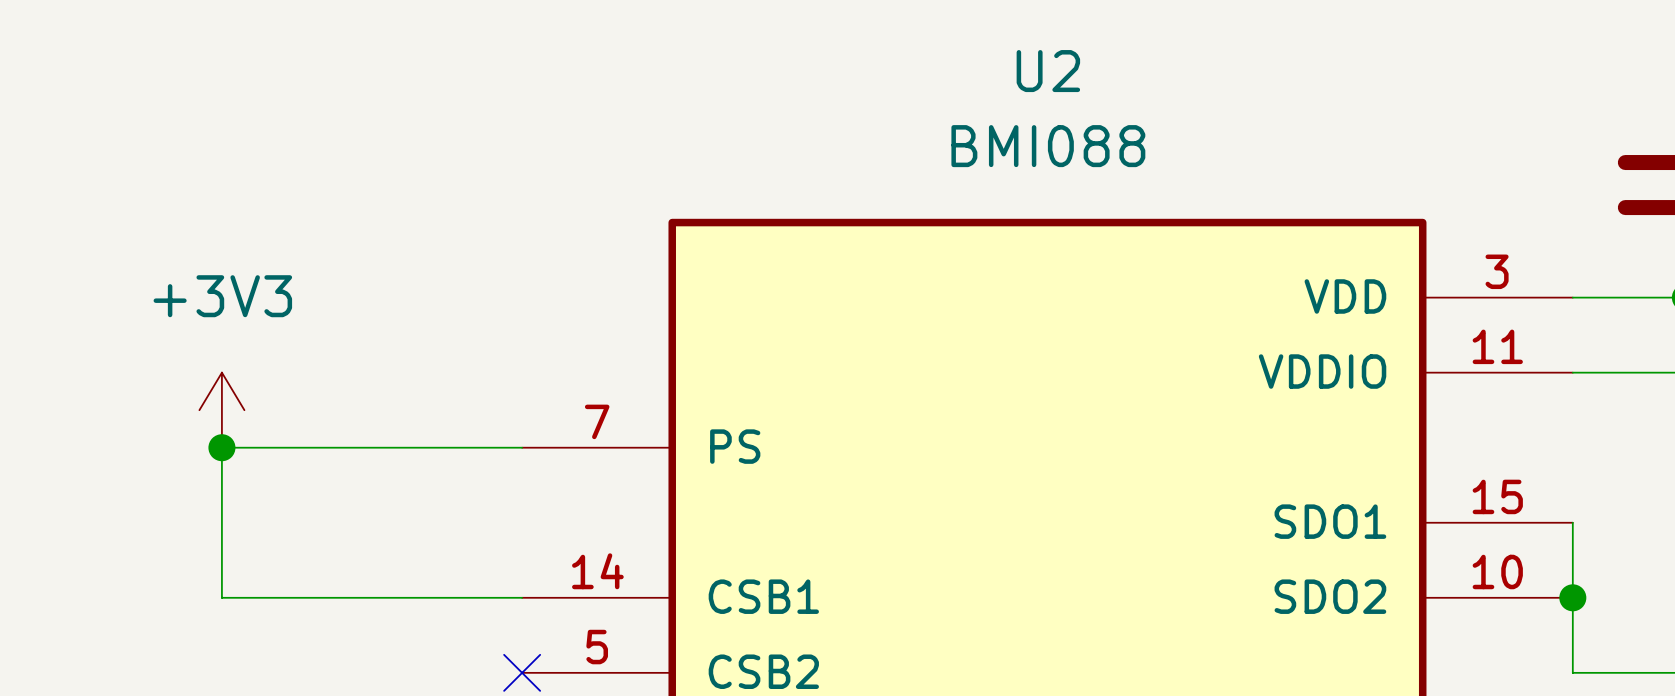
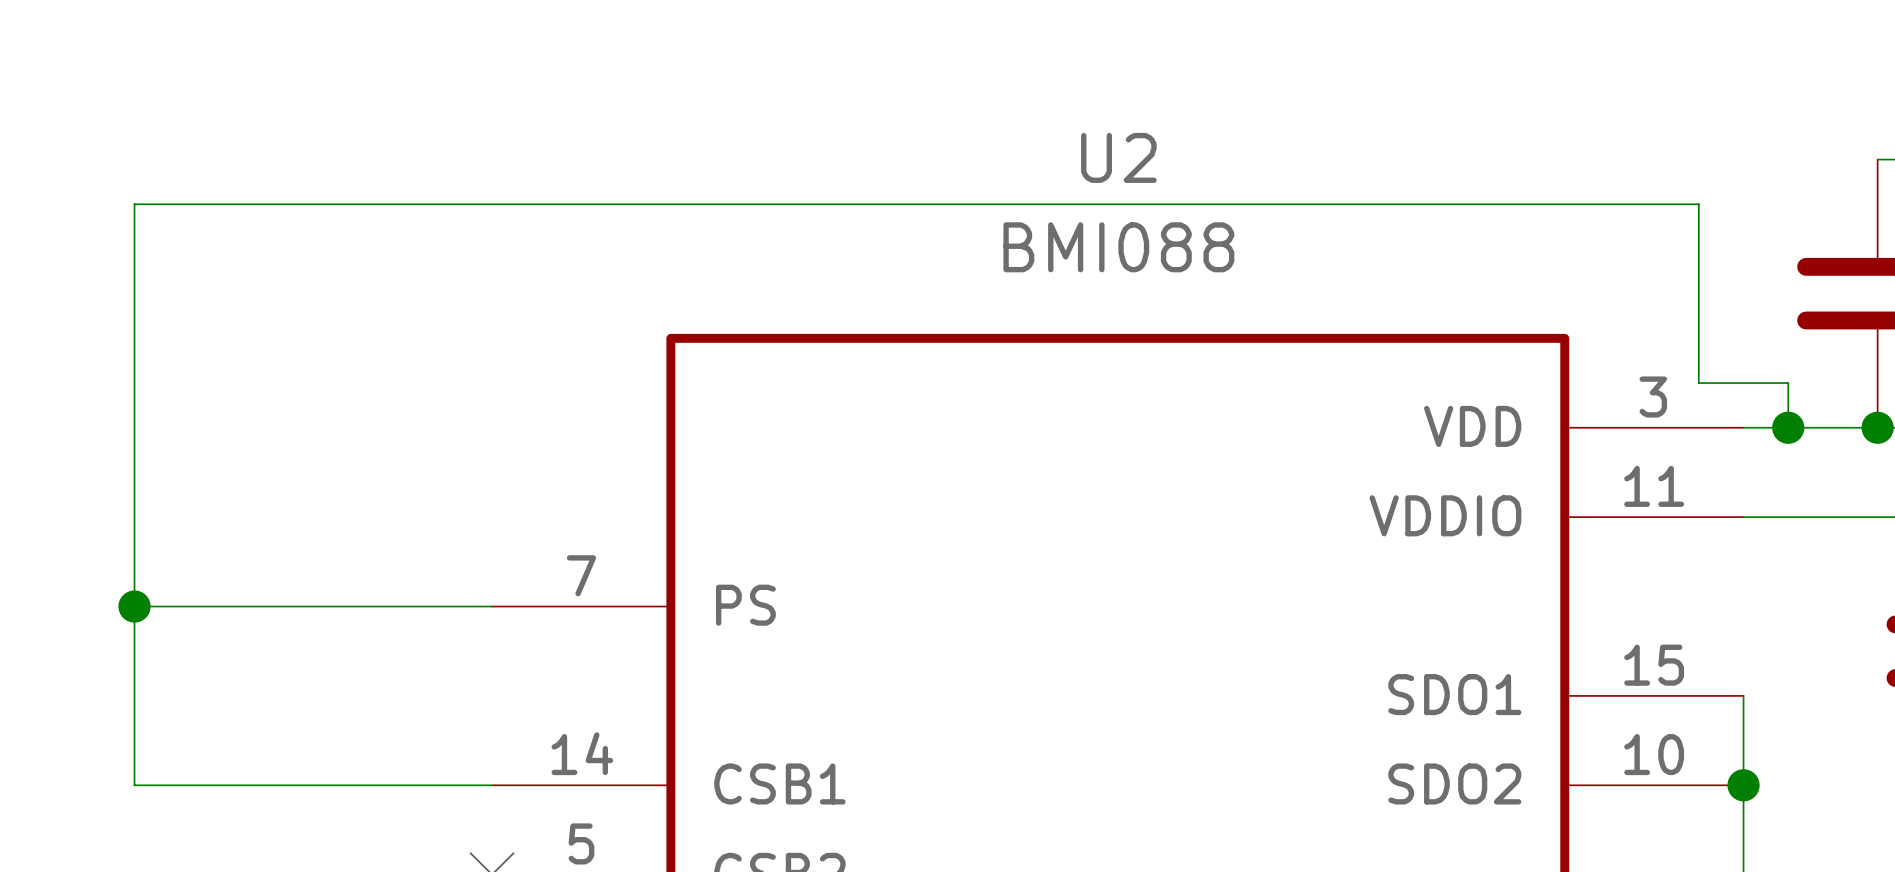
wire: none -> (1788, 427) (1788, 383) (1698, 383) (1698, 204) (134, 204) (134, 606)
junction: none -> (1788, 427)
power symbol: +3V3 (221, 410) -> none

